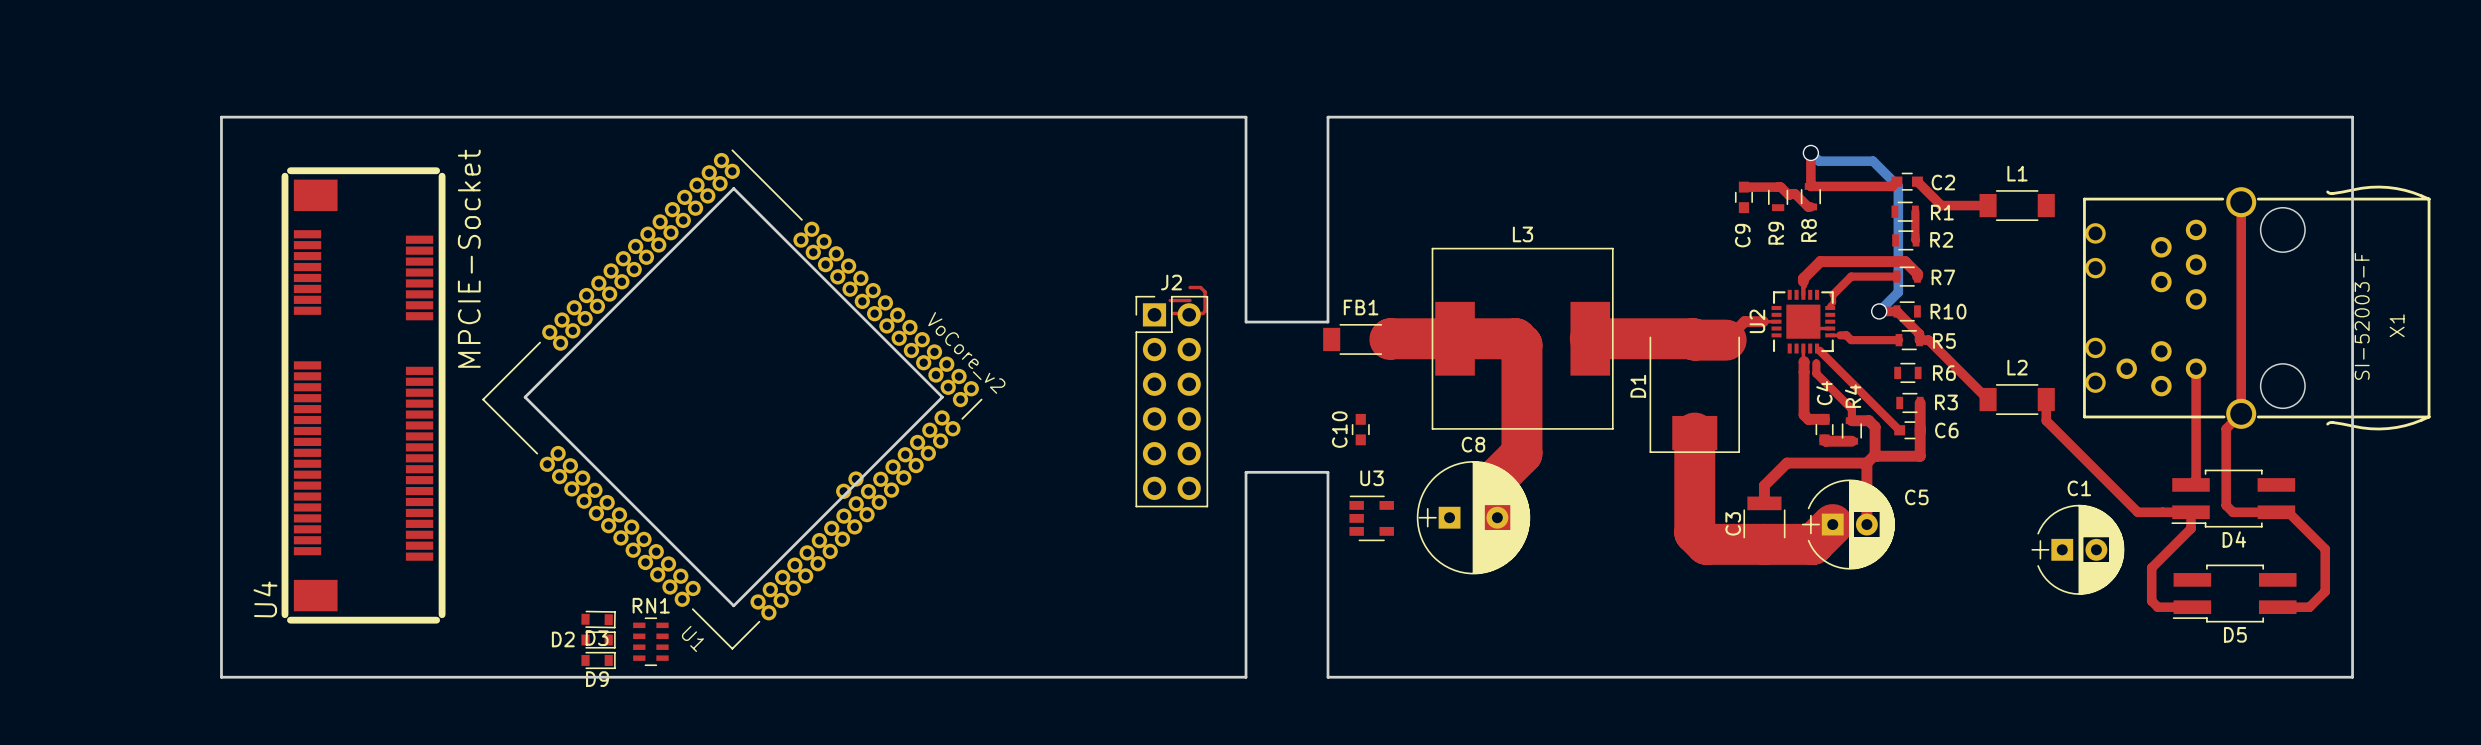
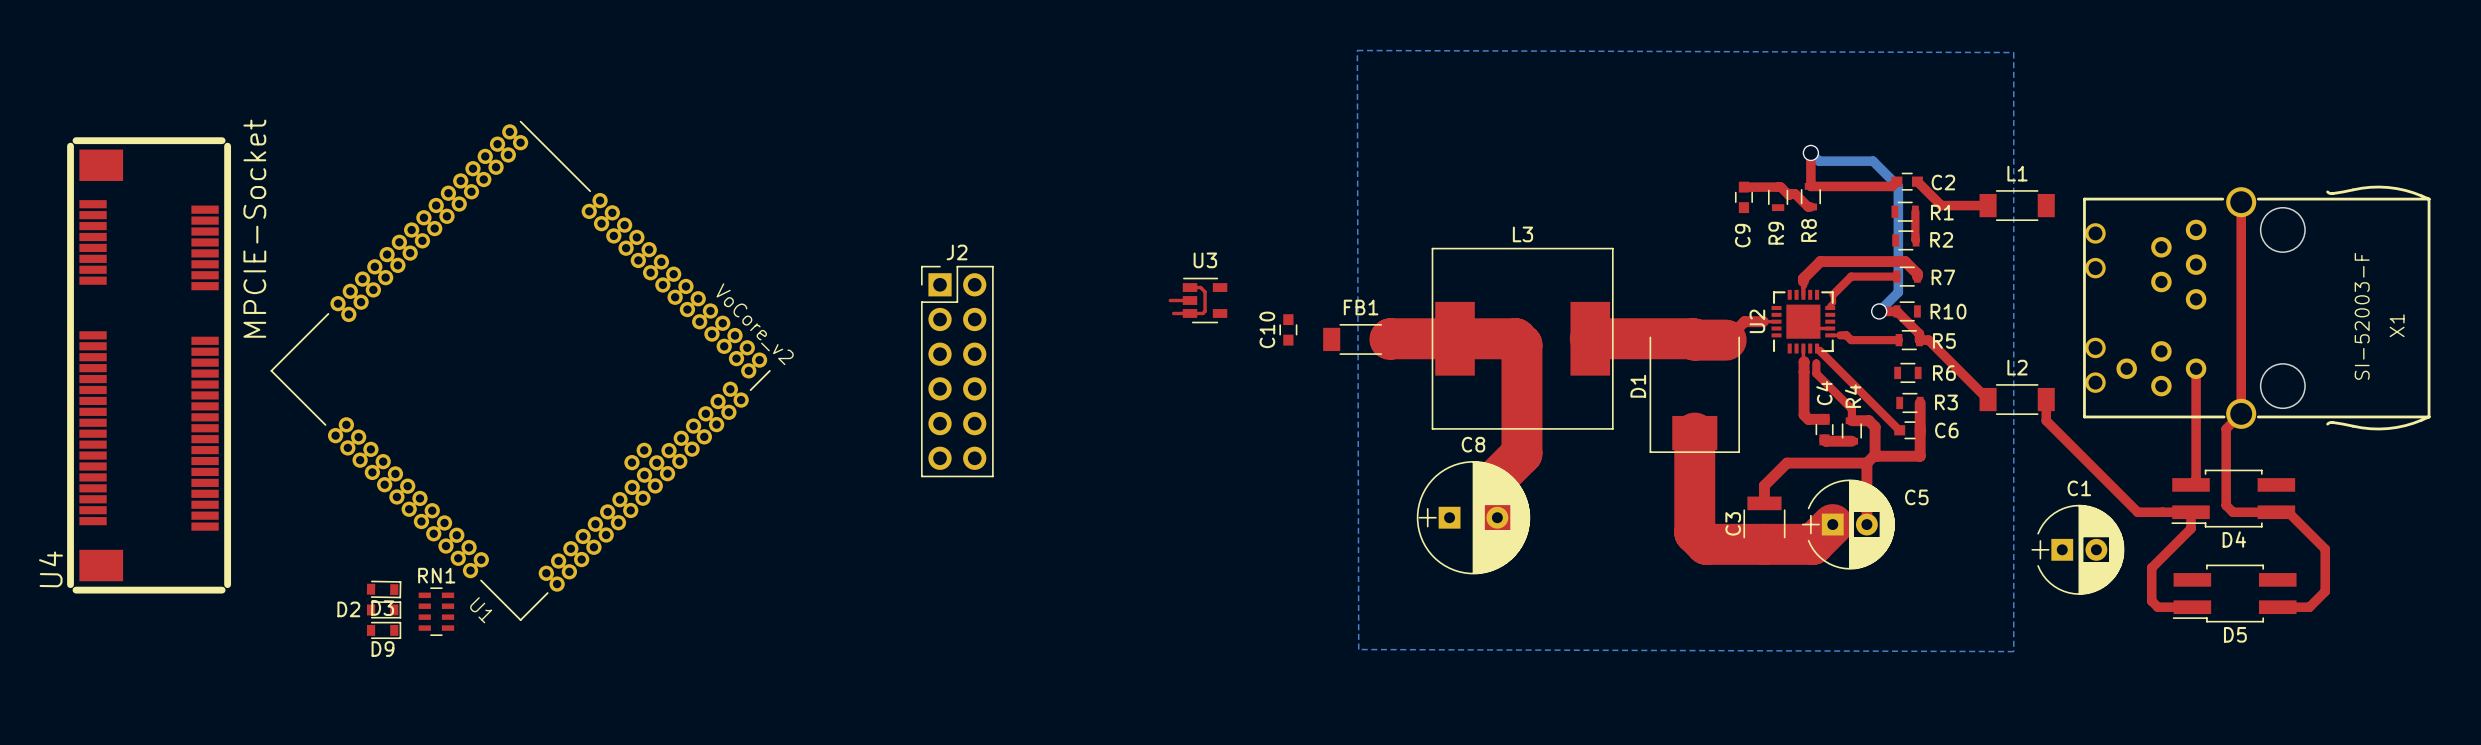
bottom zone outline: none -> (1357, 50) (2013, 52) (2013, 651) (1358, 649) (1357, 50)
board edge: (221, 117) (1246, 117) (1246, 322) (1327, 322) (1327, 117) (2352, 117) (2352, 677) (1327, 677) (1327, 472) (1246, 472) (1246, 677) (221, 677) (221, 117) -> none
board edge: (733, 188) (942, 397) (733, 605) (525, 397) (733, 188) -> none
U4 position: (363, 395) -> (149, 365)
U1 position: (732, 399) -> (520, 370)
J2 position: (1171, 401) -> (957, 371)
C10 position: (1360, 429) -> (1288, 329)
U3 position: (1371, 518) -> (1205, 300)
D3 position: (598, 619) -> (384, 589)
D2 position: (598, 639) -> (384, 609)
RN1 position: (650, 641) -> (436, 611)
D9 position: (598, 660) -> (384, 630)

